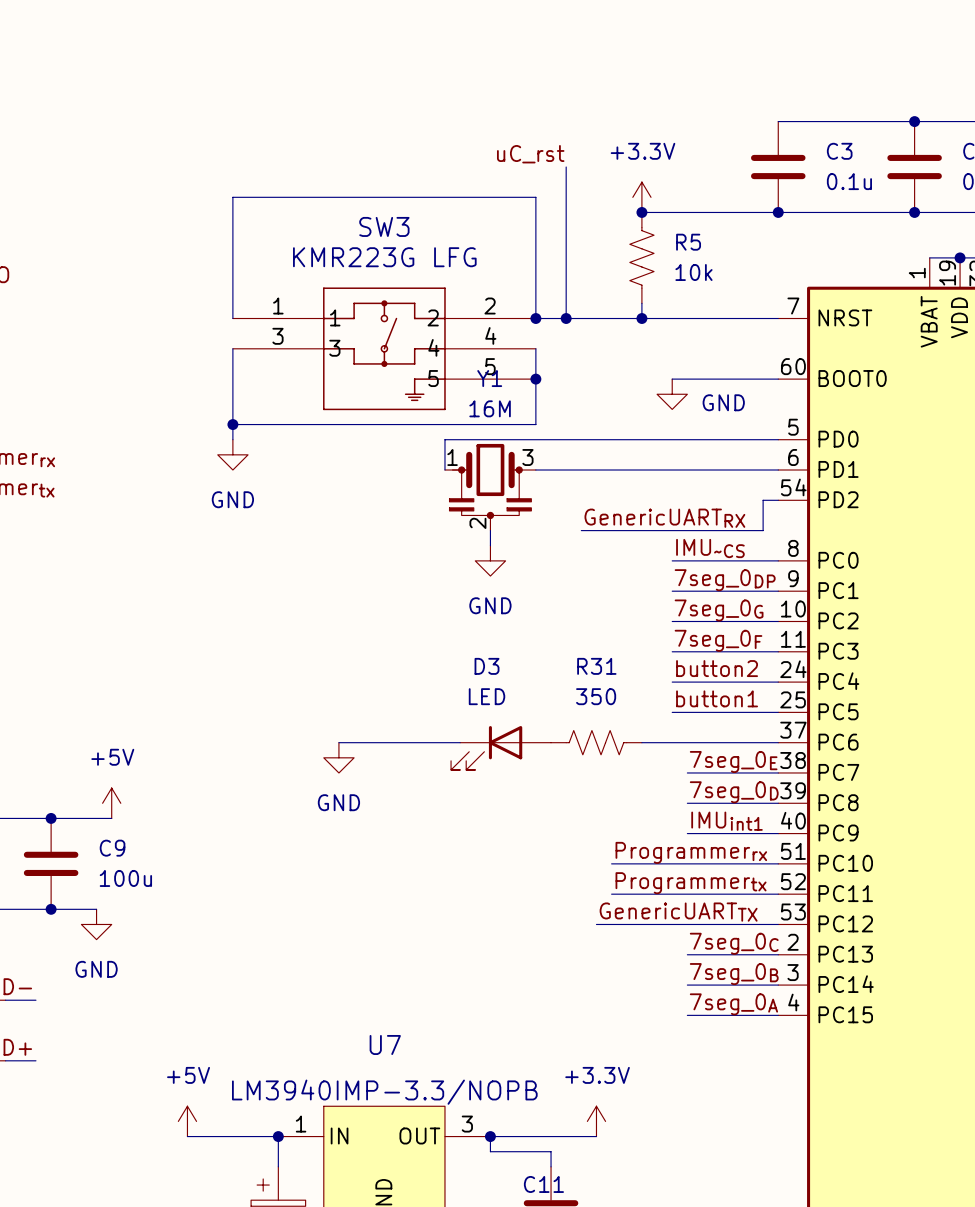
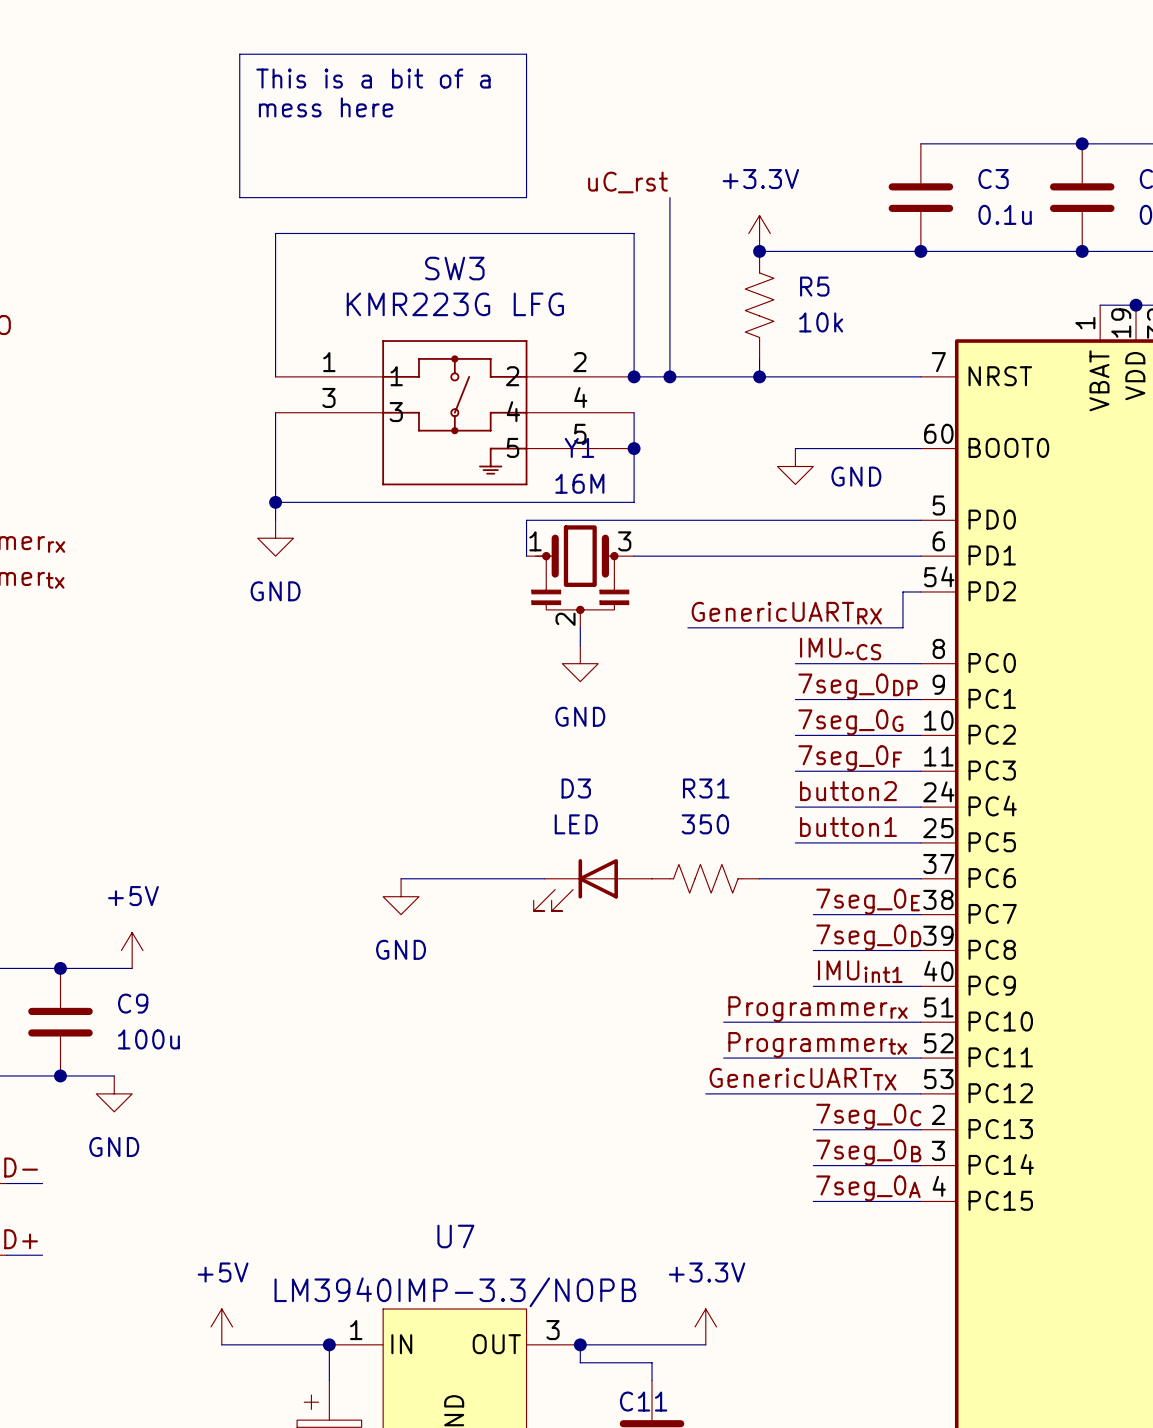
line: none -> (239, 54) (526, 54) (526, 197) (239, 197) (239, 54)
text: none -> This is a bit of a (373, 78)
text: none -> mess here (326, 107)

